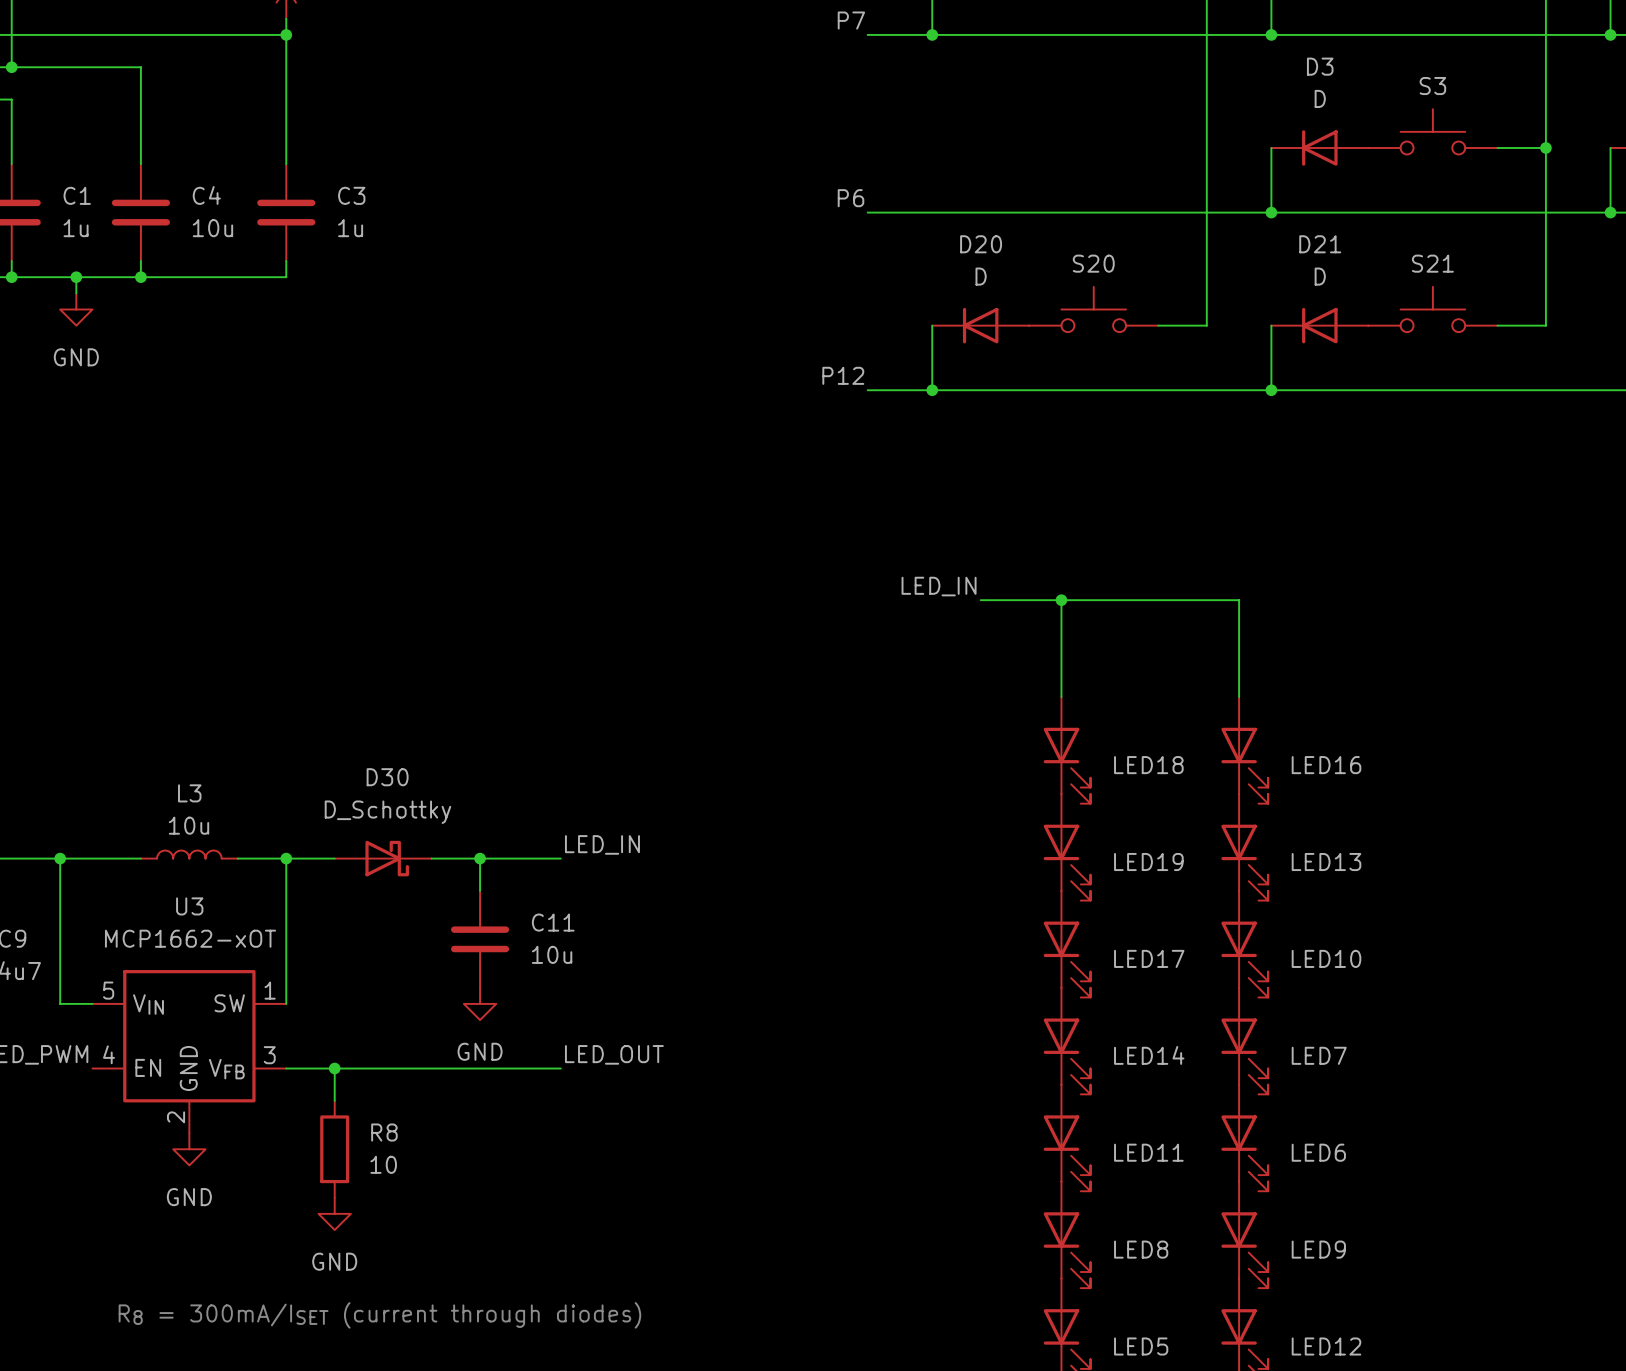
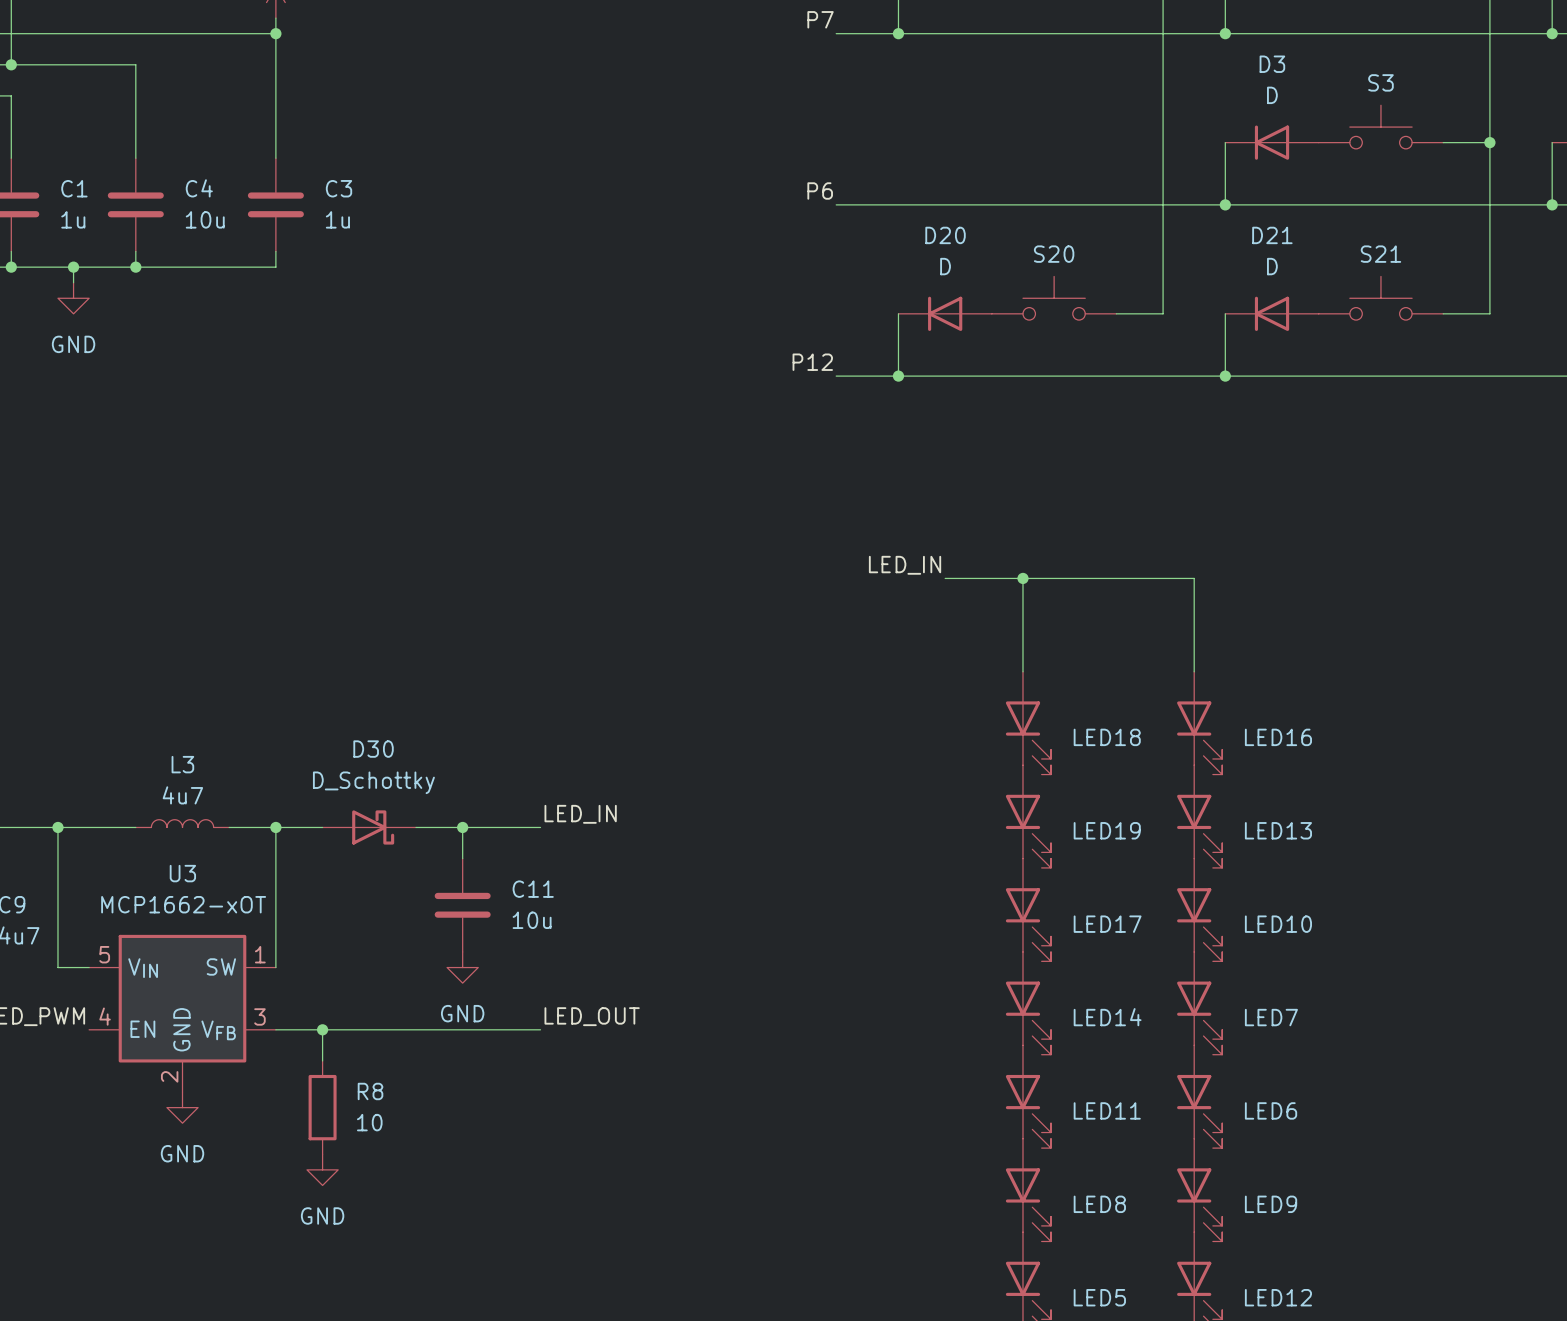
L3 value: 10u (188, 825) -> 4u7 (182, 795)
text: R8 = 300mA/ISET (current through diodes) (379, 1315) -> none

